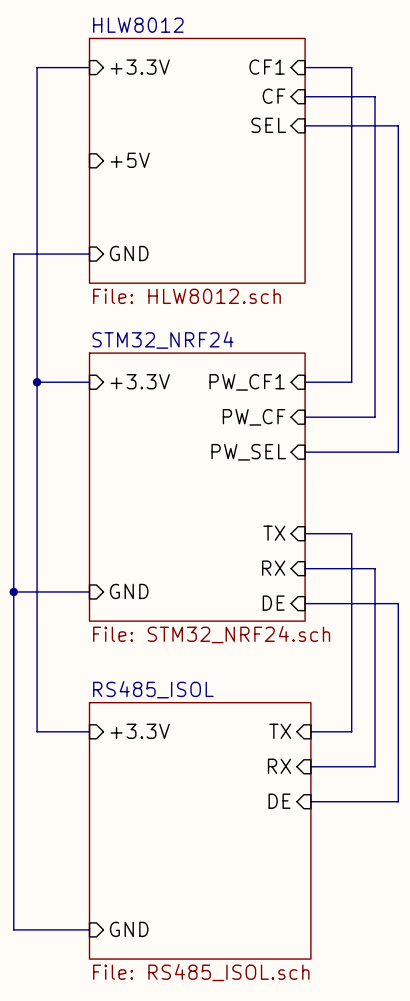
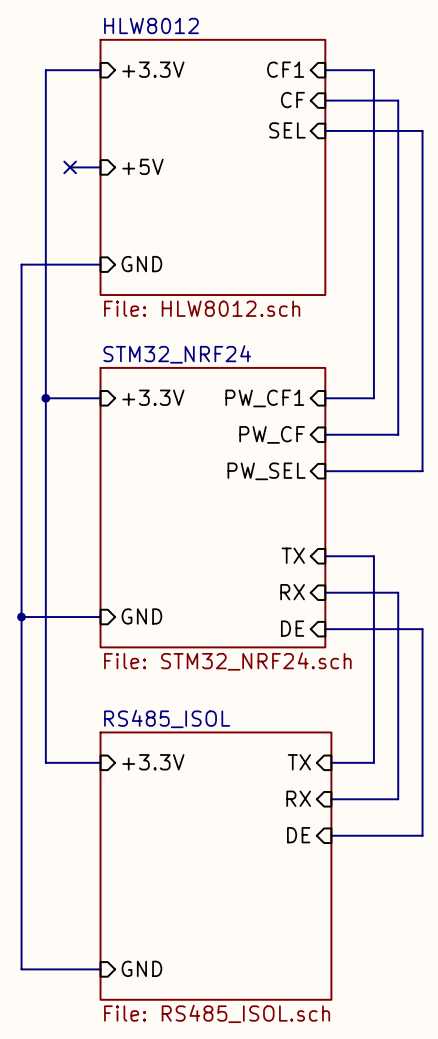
wire: none -> (70, 167) (100, 167)
no-connect mark: none -> (70, 167)

